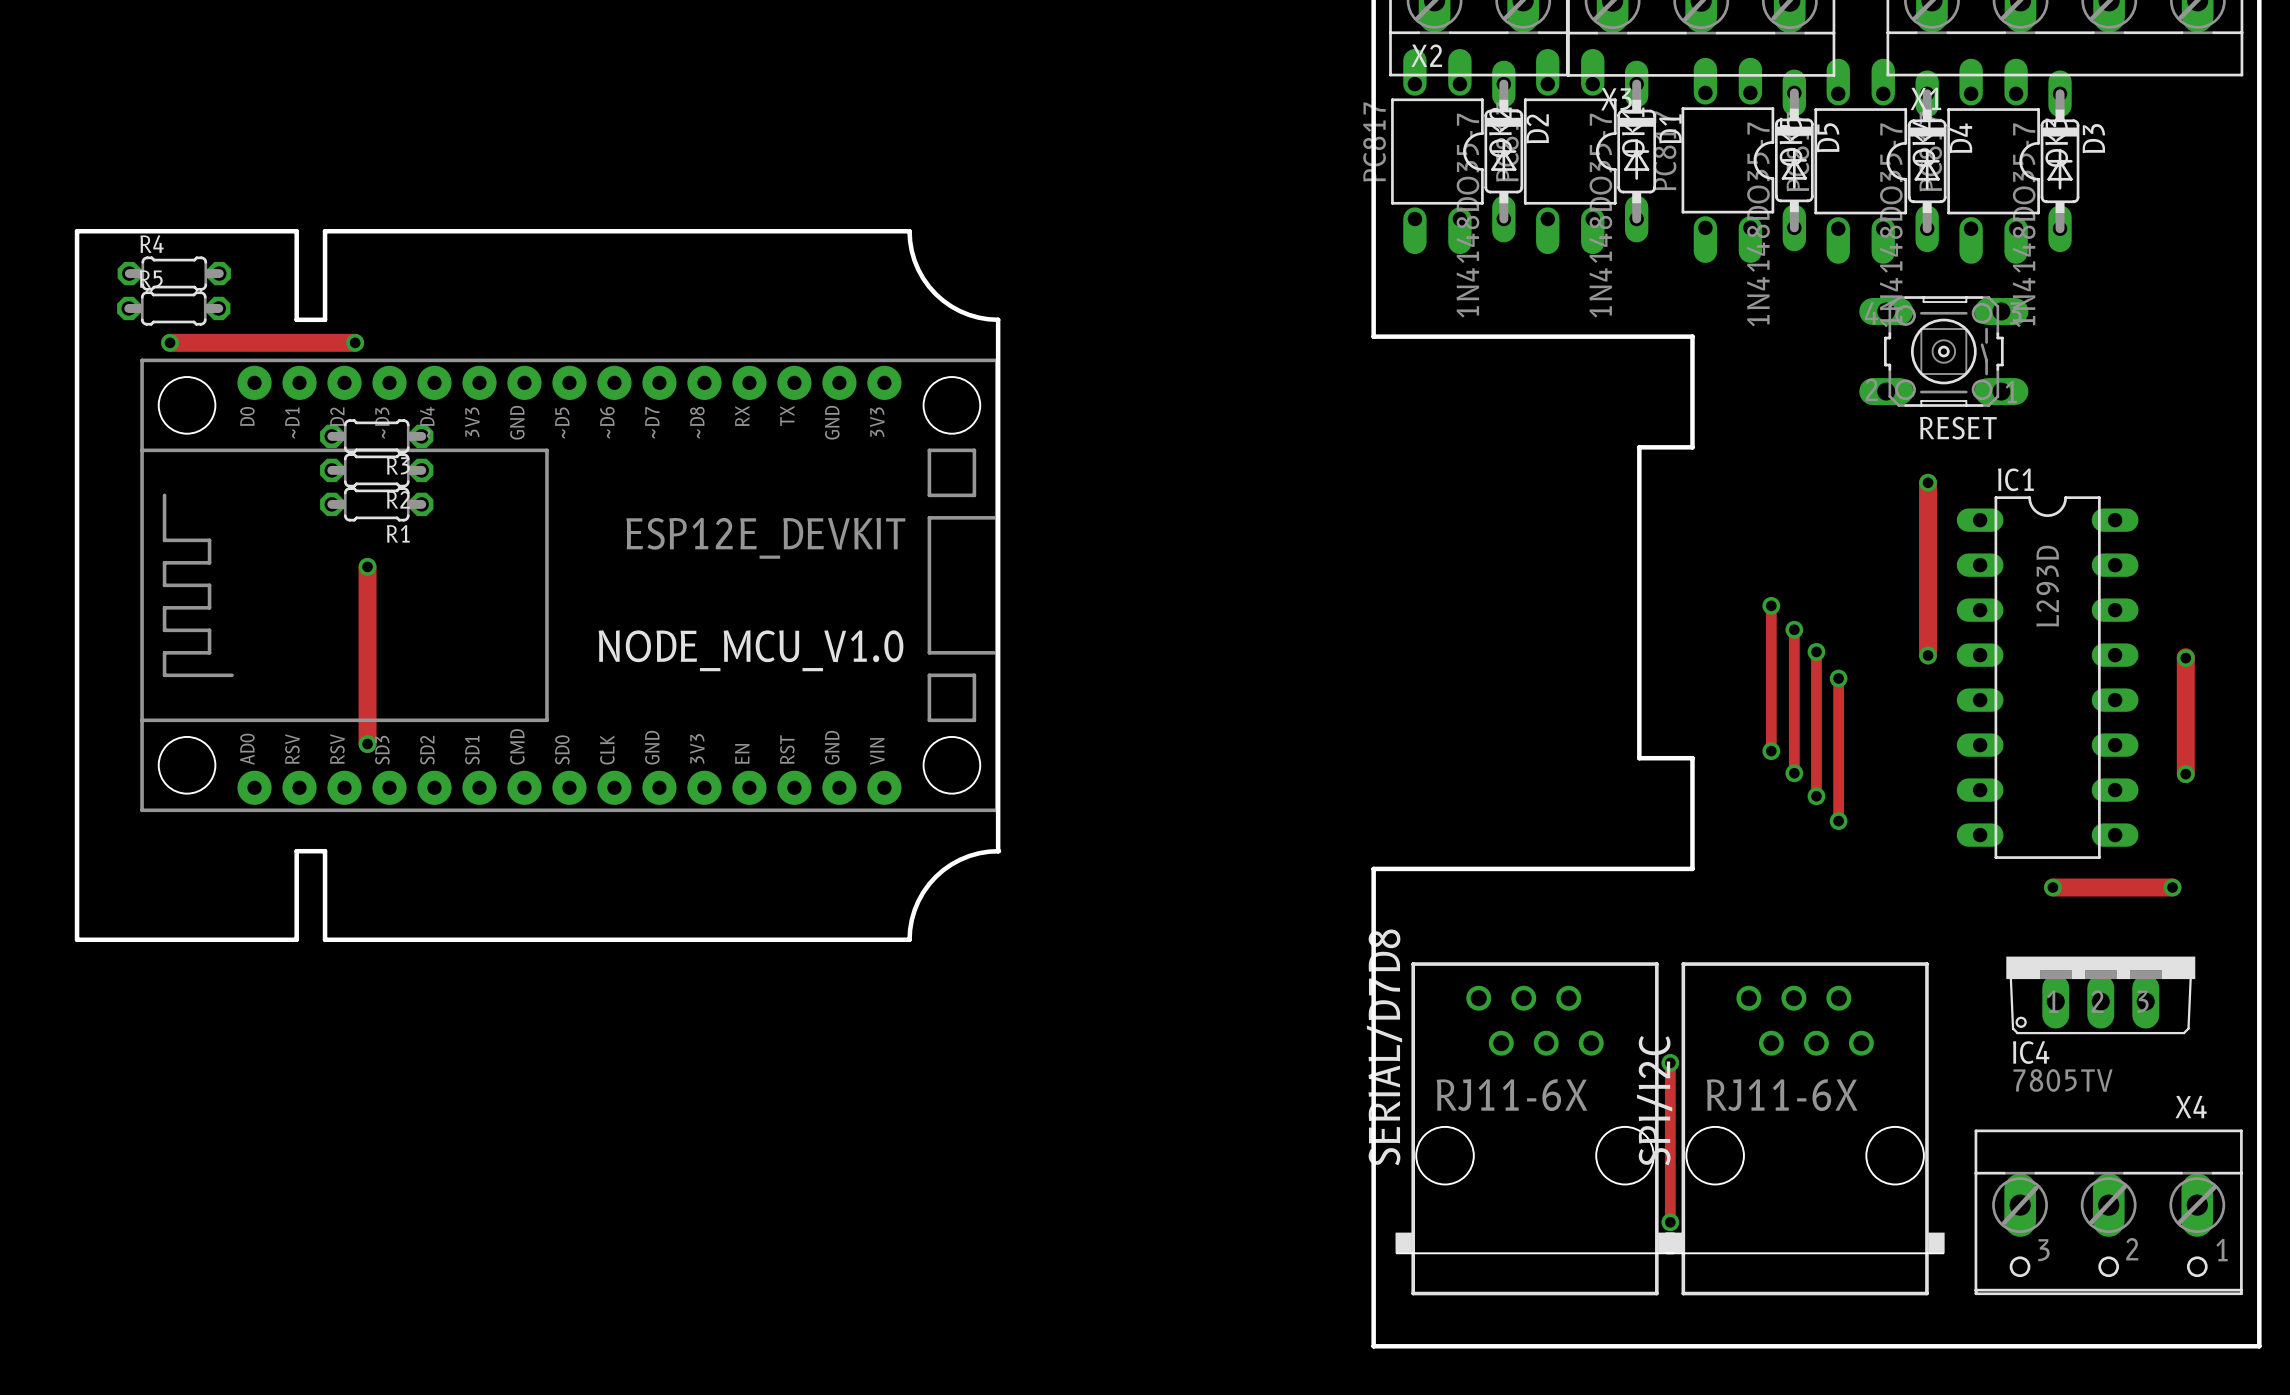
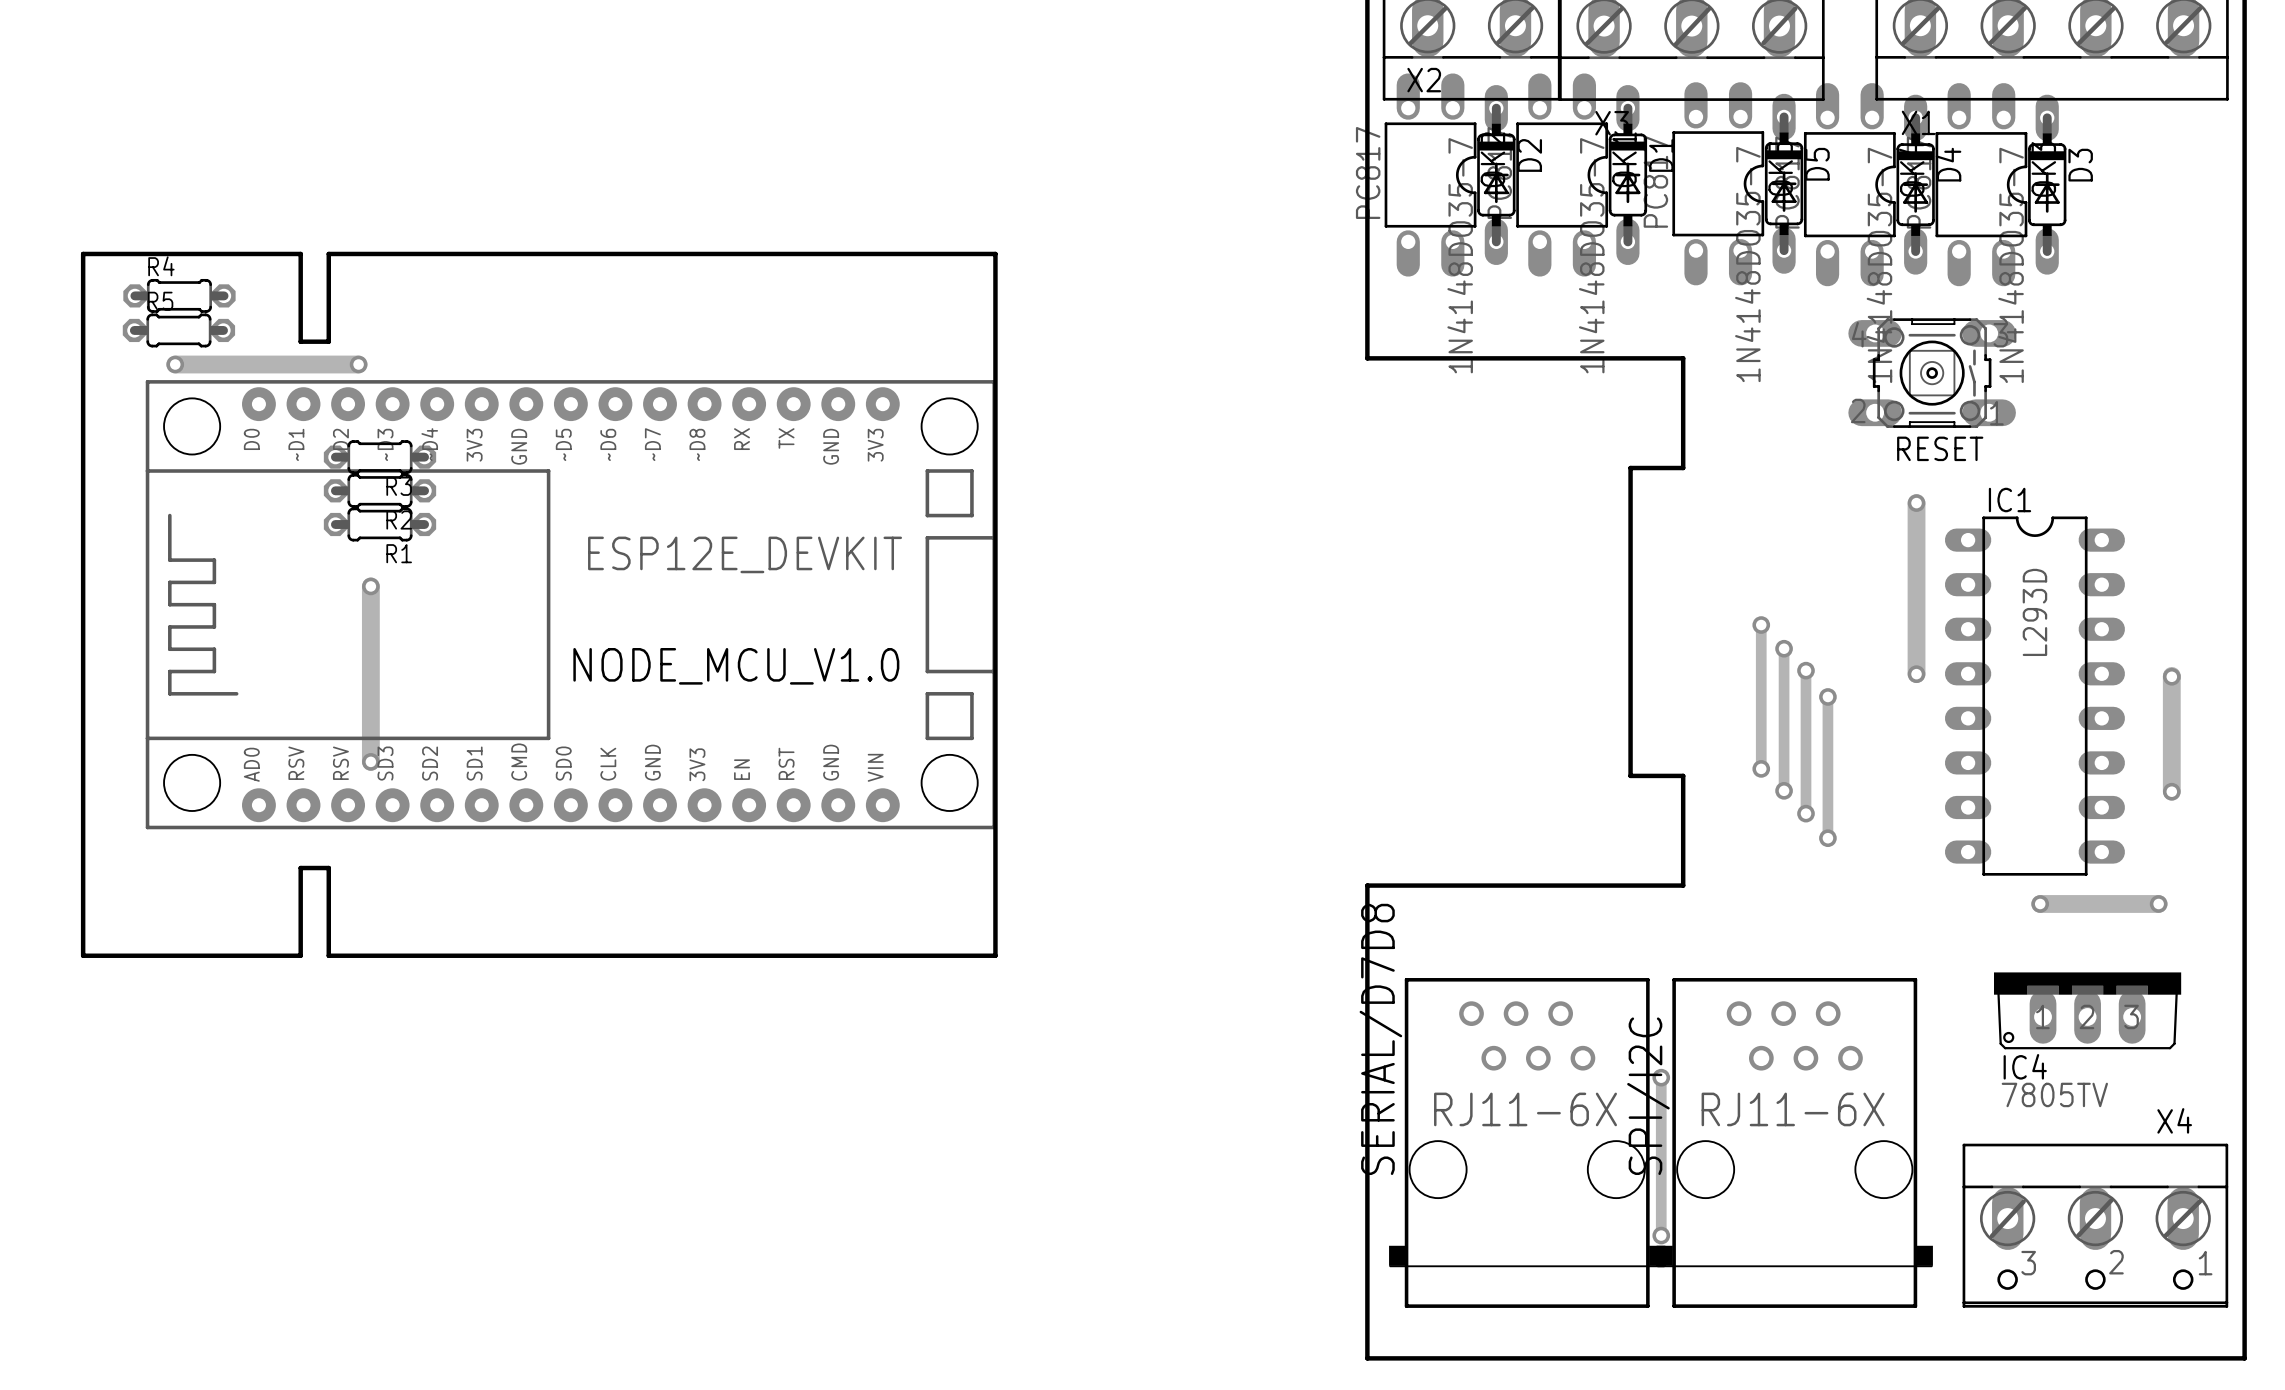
board edge: (909, 231) (914, 260) (923, 278) (935, 293) (951, 306) (968, 314) (998, 319) -> (907, 253) (995, 253) (995, 341)
board edge: (999, 851) (979, 853) (960, 859) (935, 876) (923, 892) (914, 910) (909, 939) -> (995, 868) (995, 955) (907, 955)

